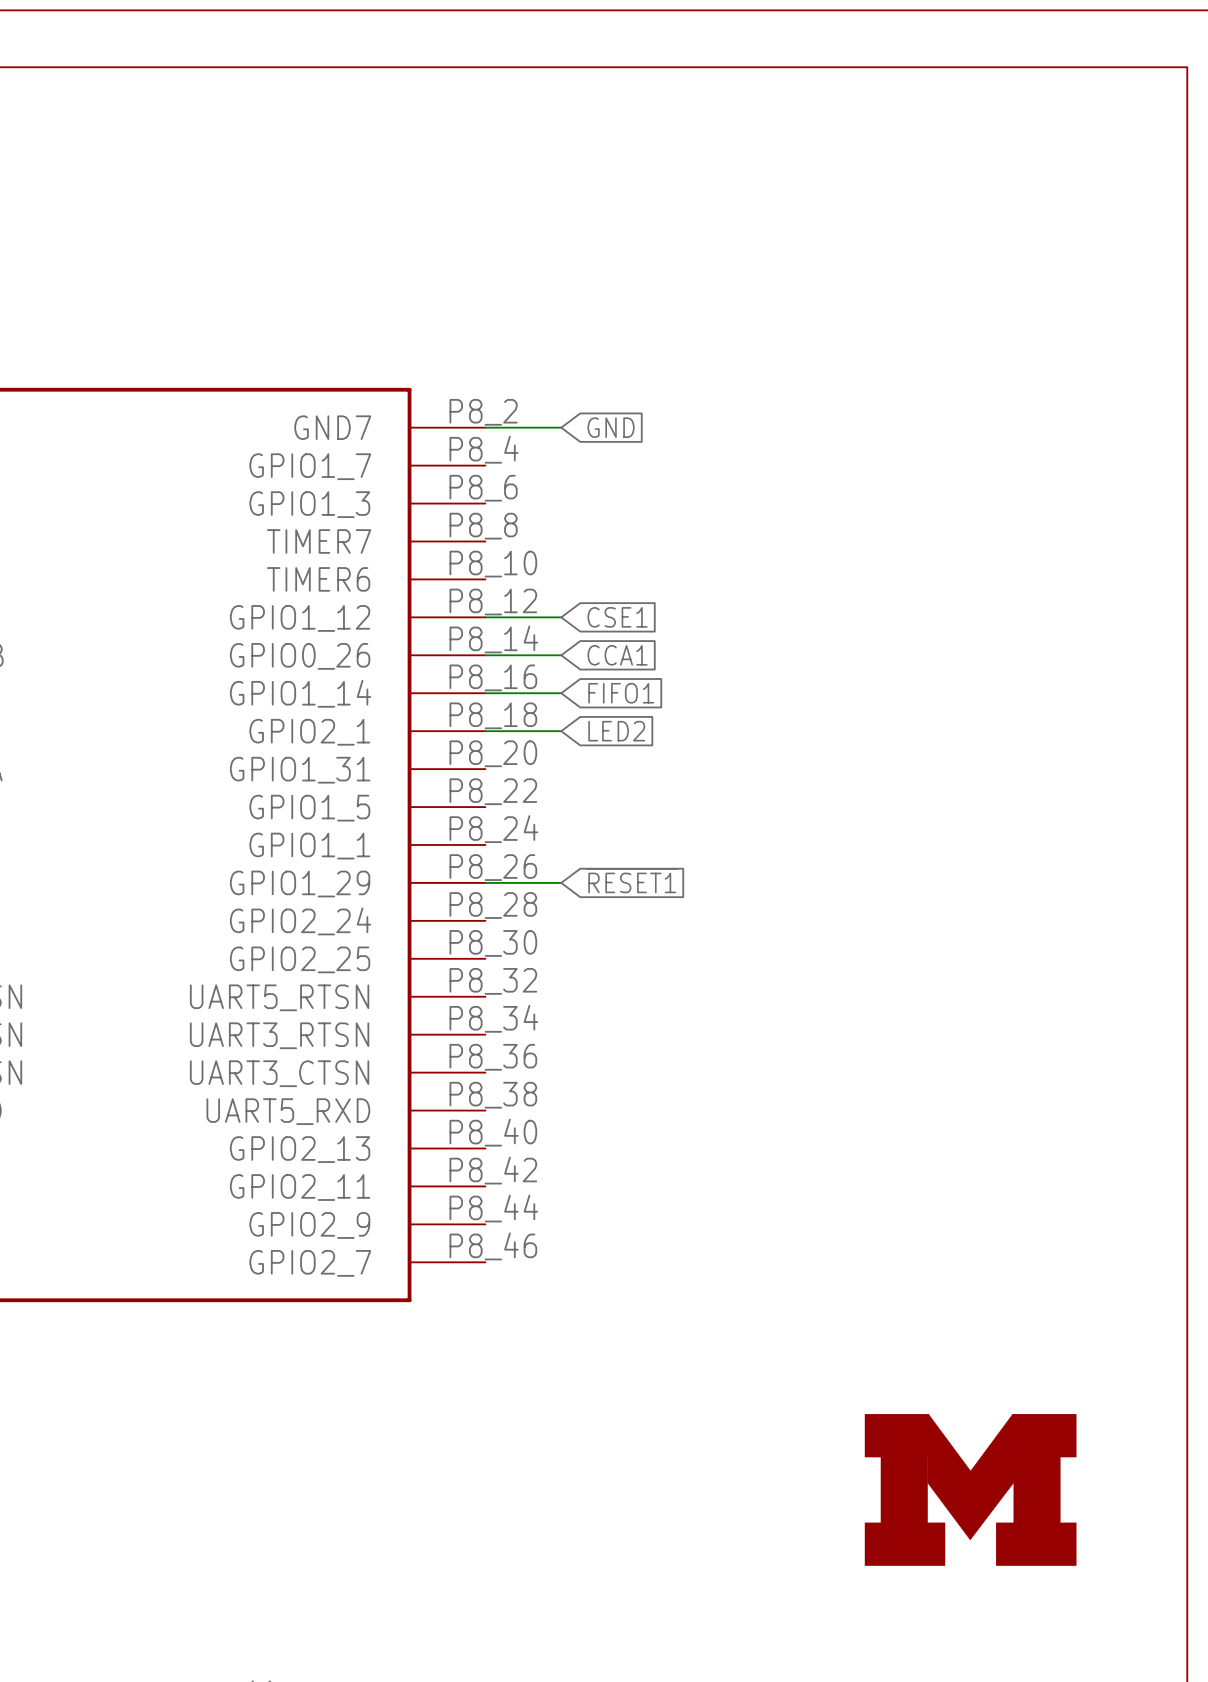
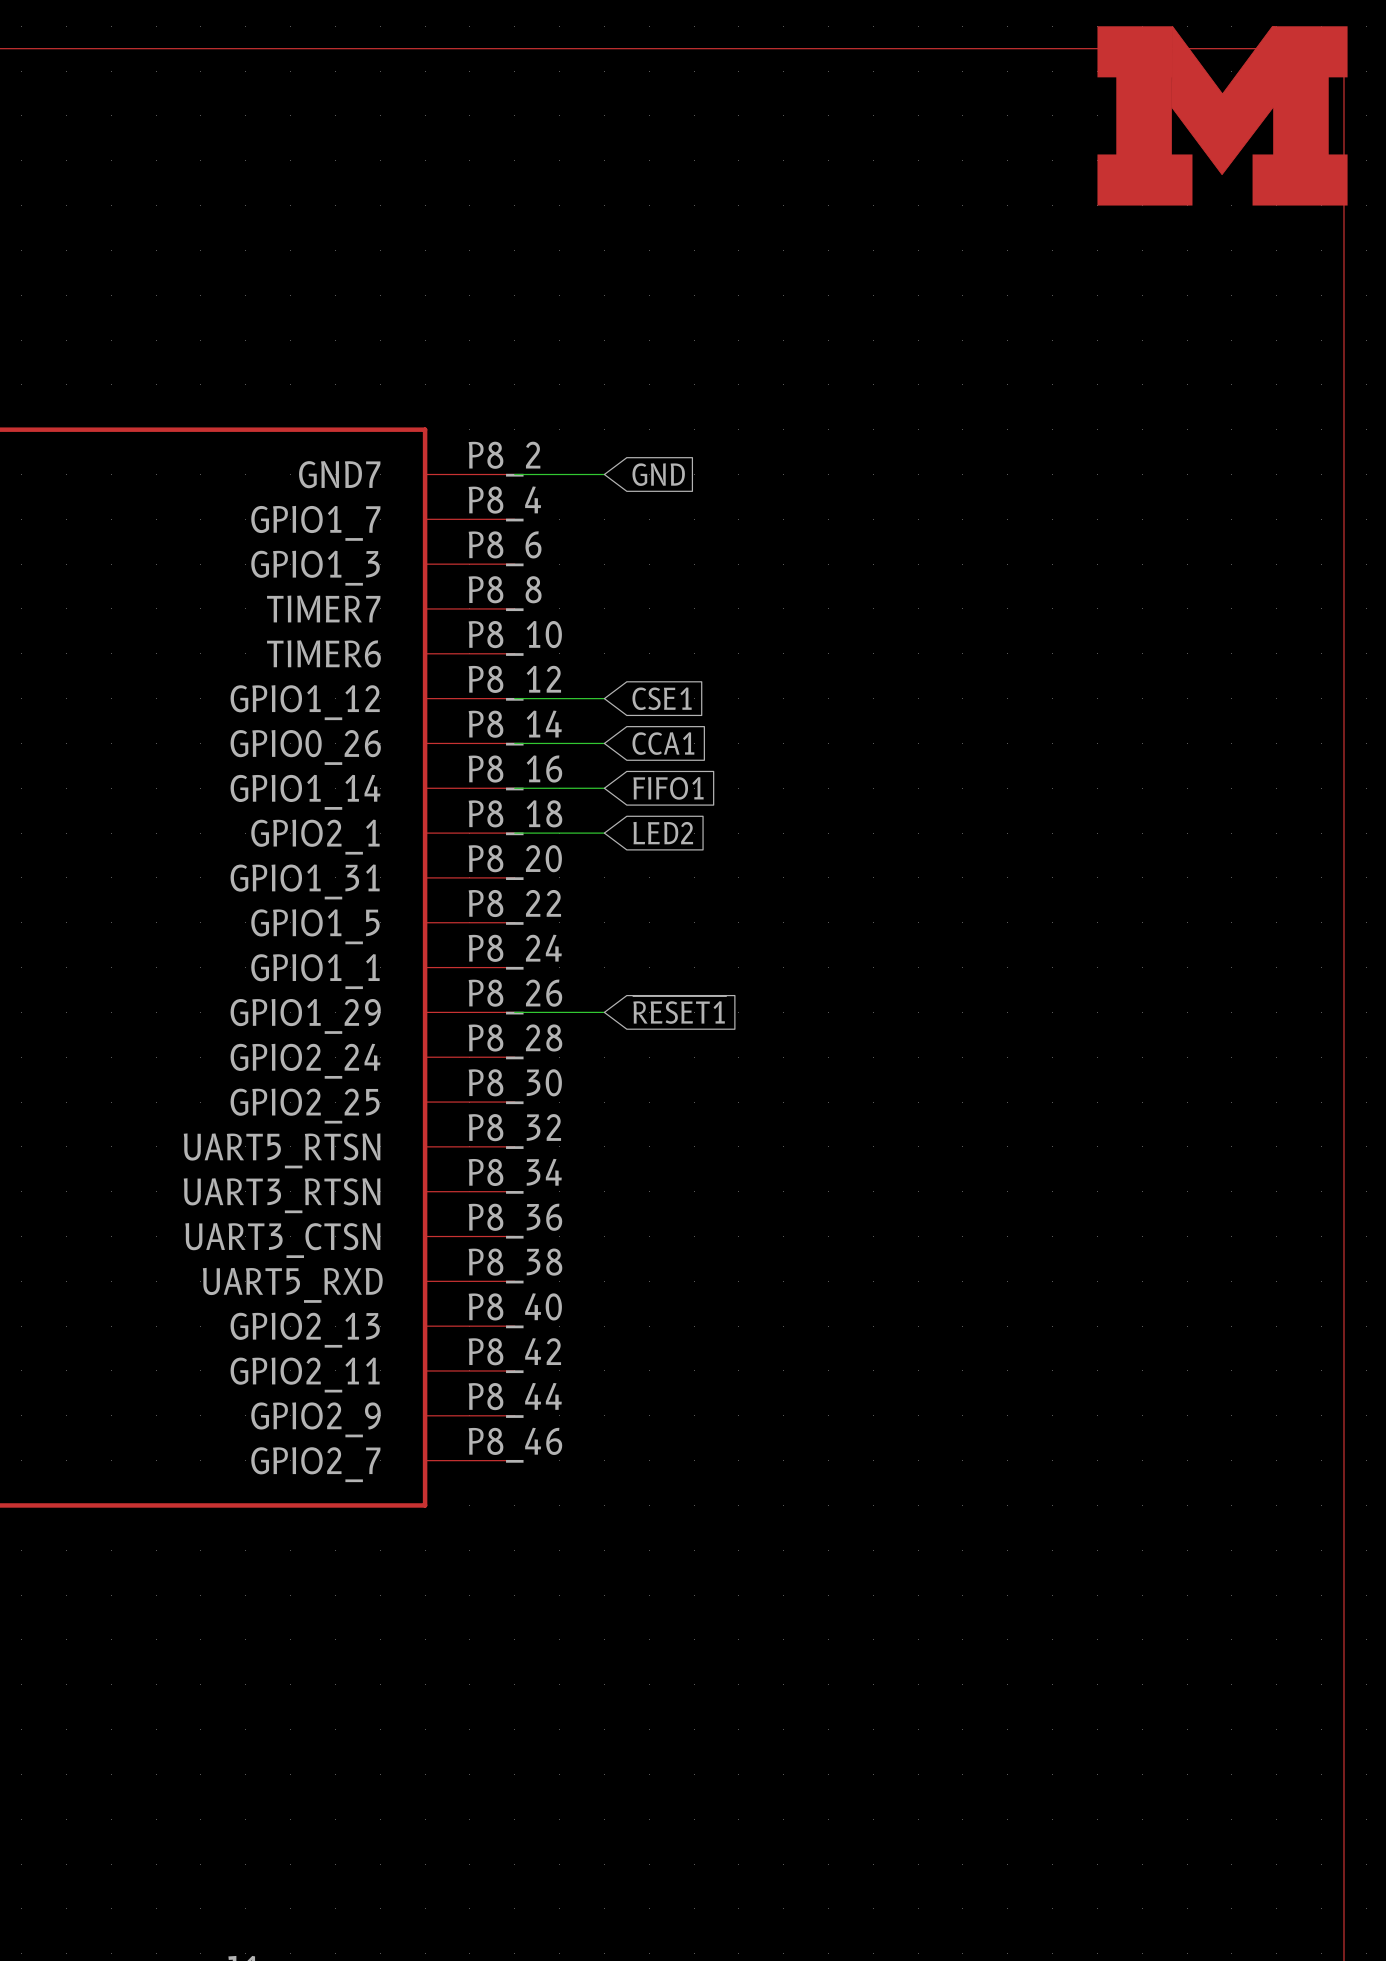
part: none -> (1222, 115)
part: (970, 1489) -> none

